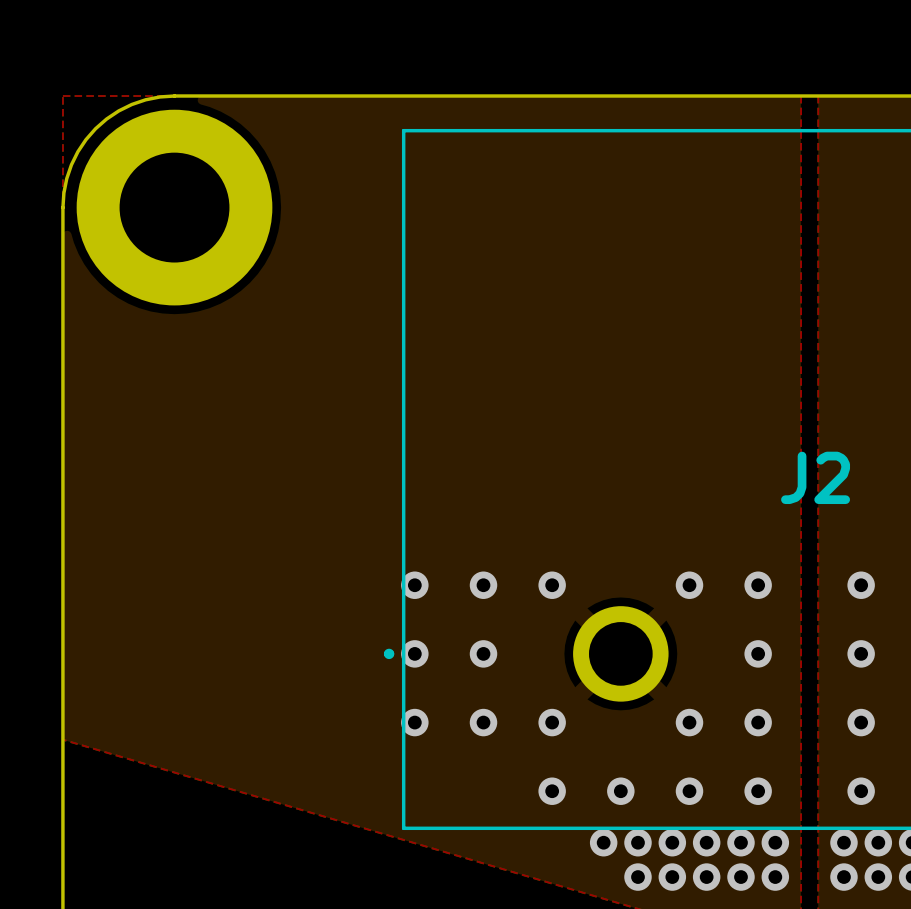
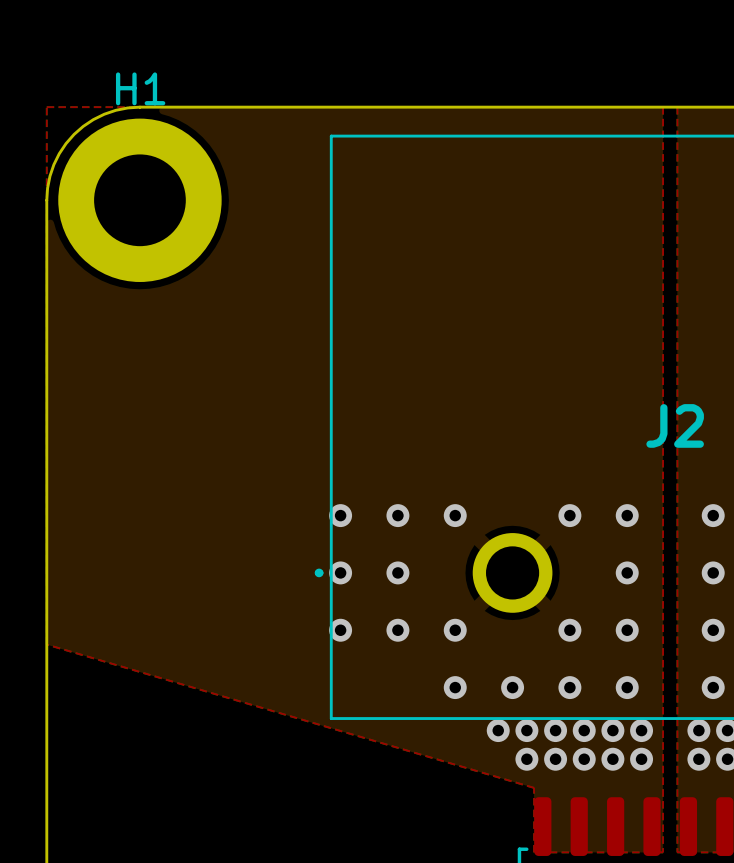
H1 name: none -> H1 (140, 88)

